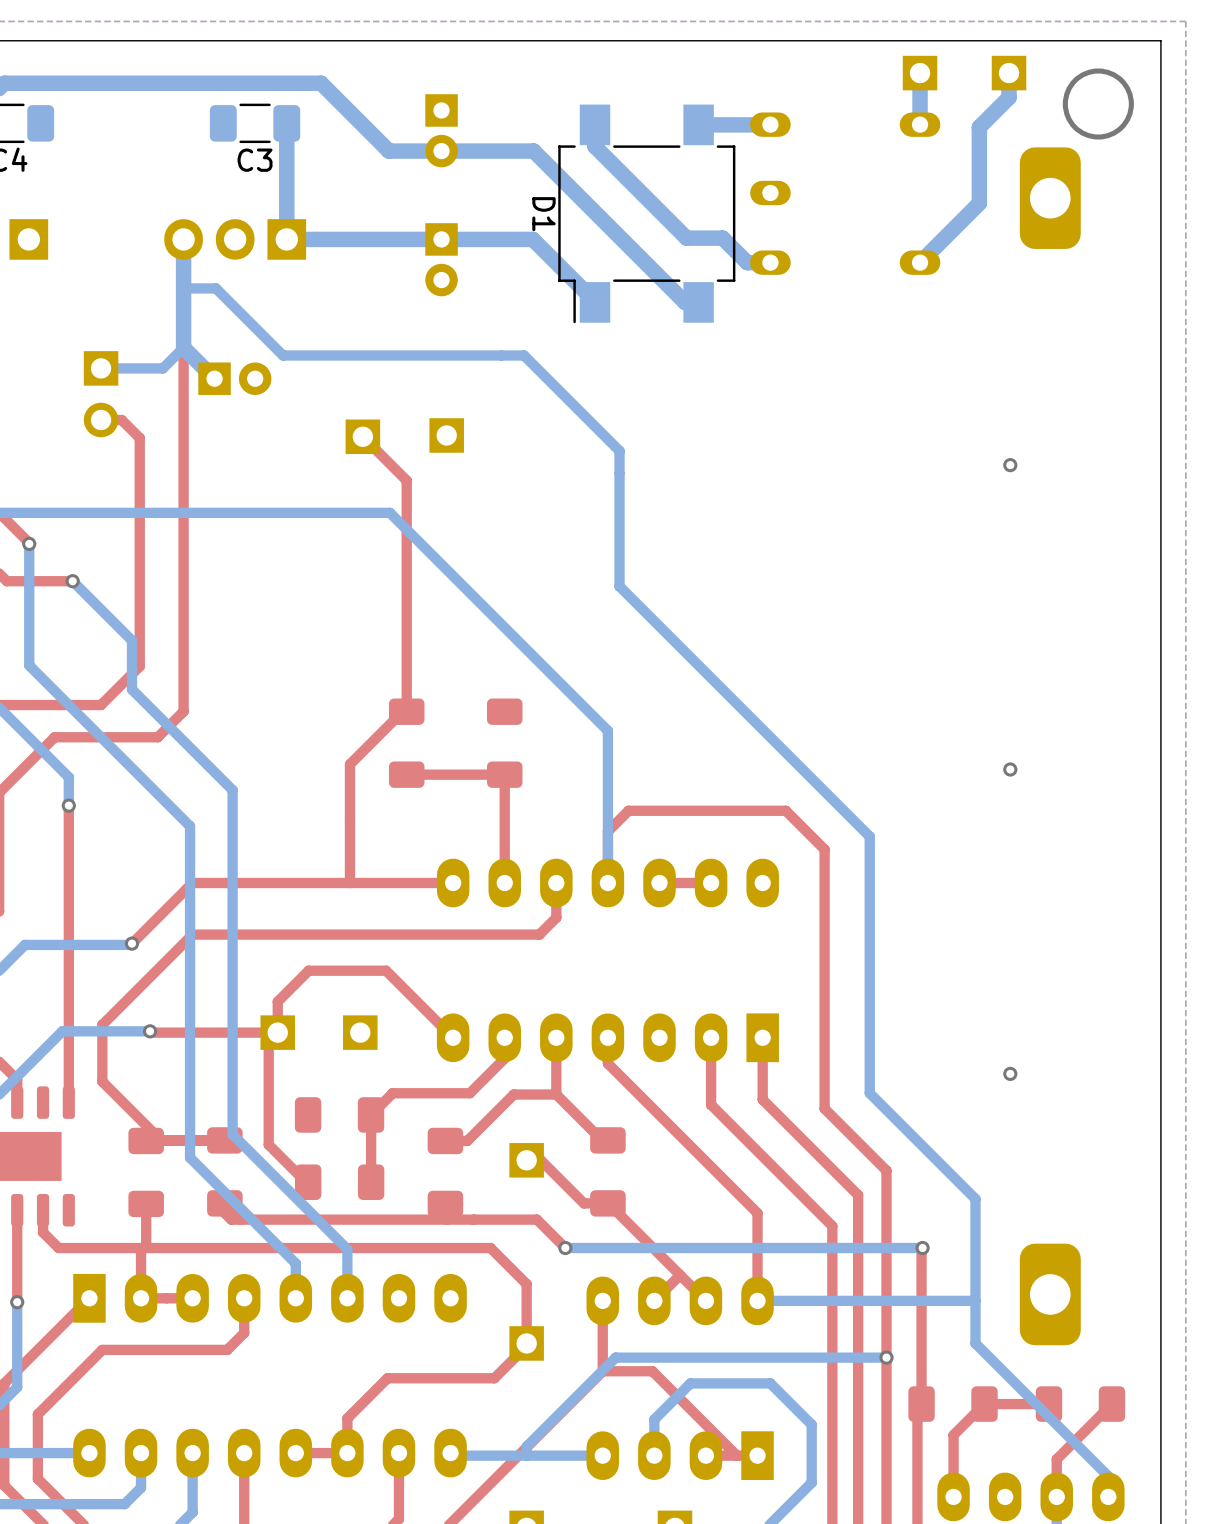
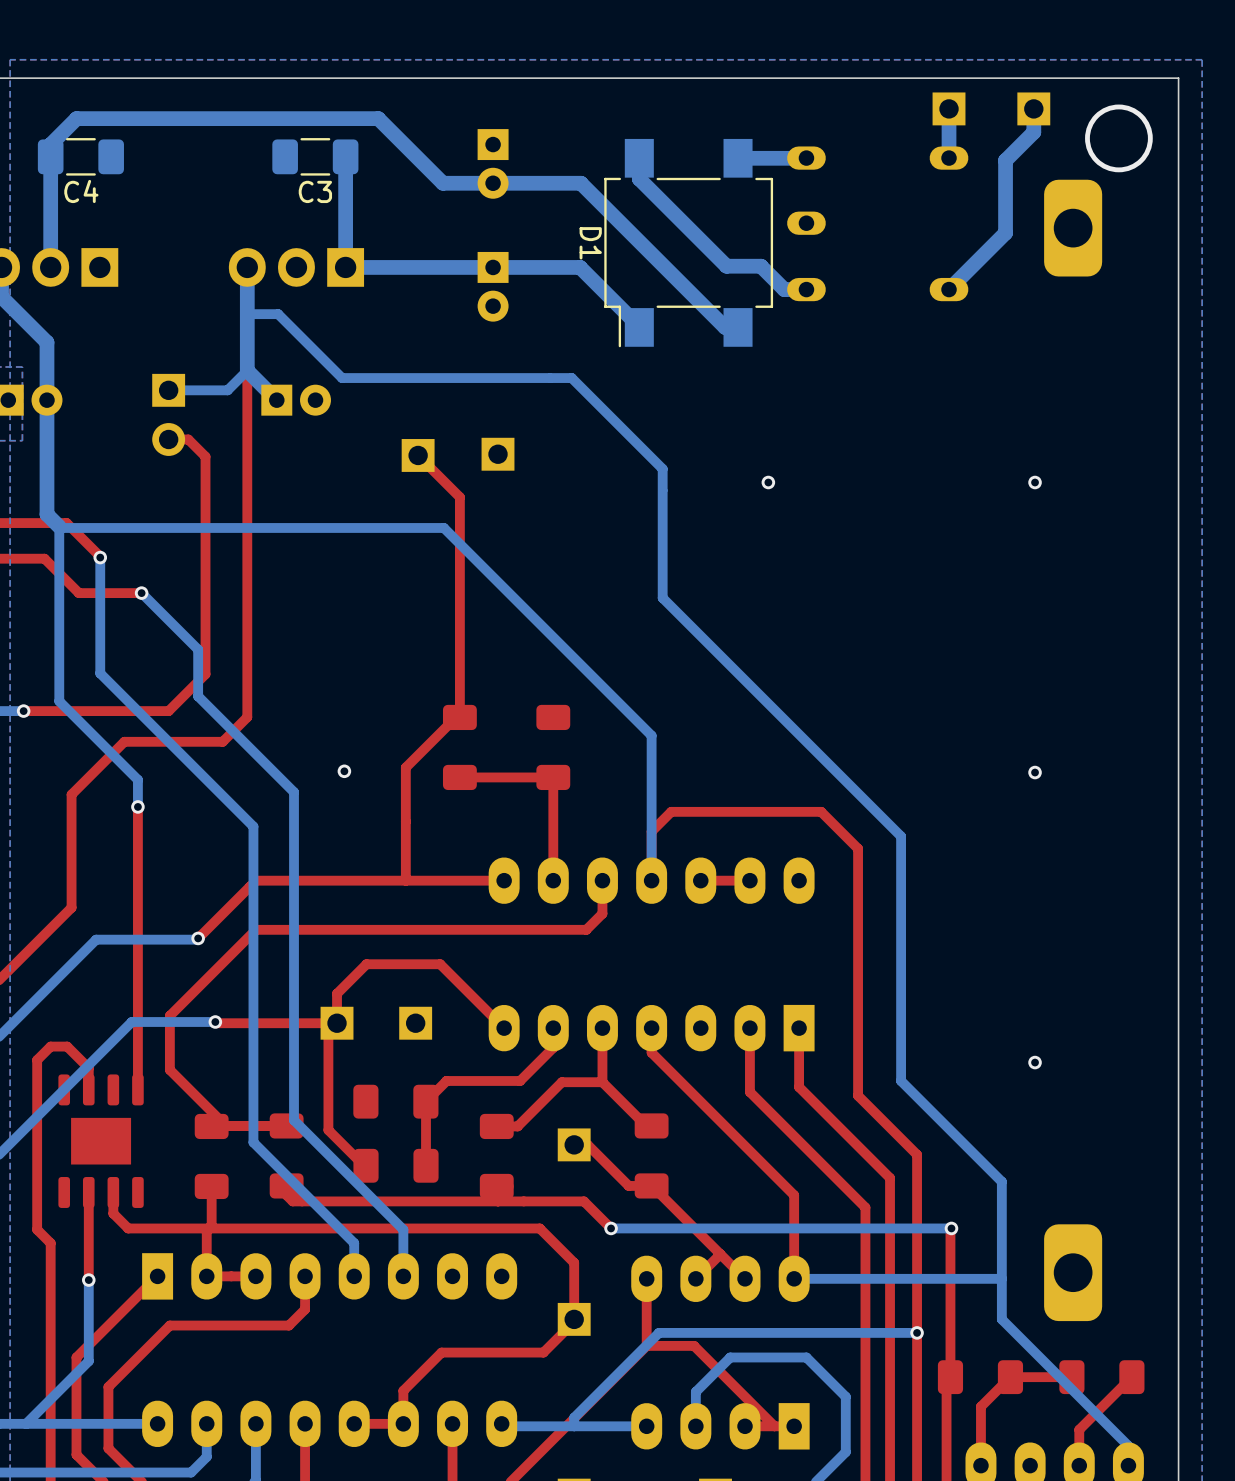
via: none -> (768, 482)
via: none -> (344, 771)

